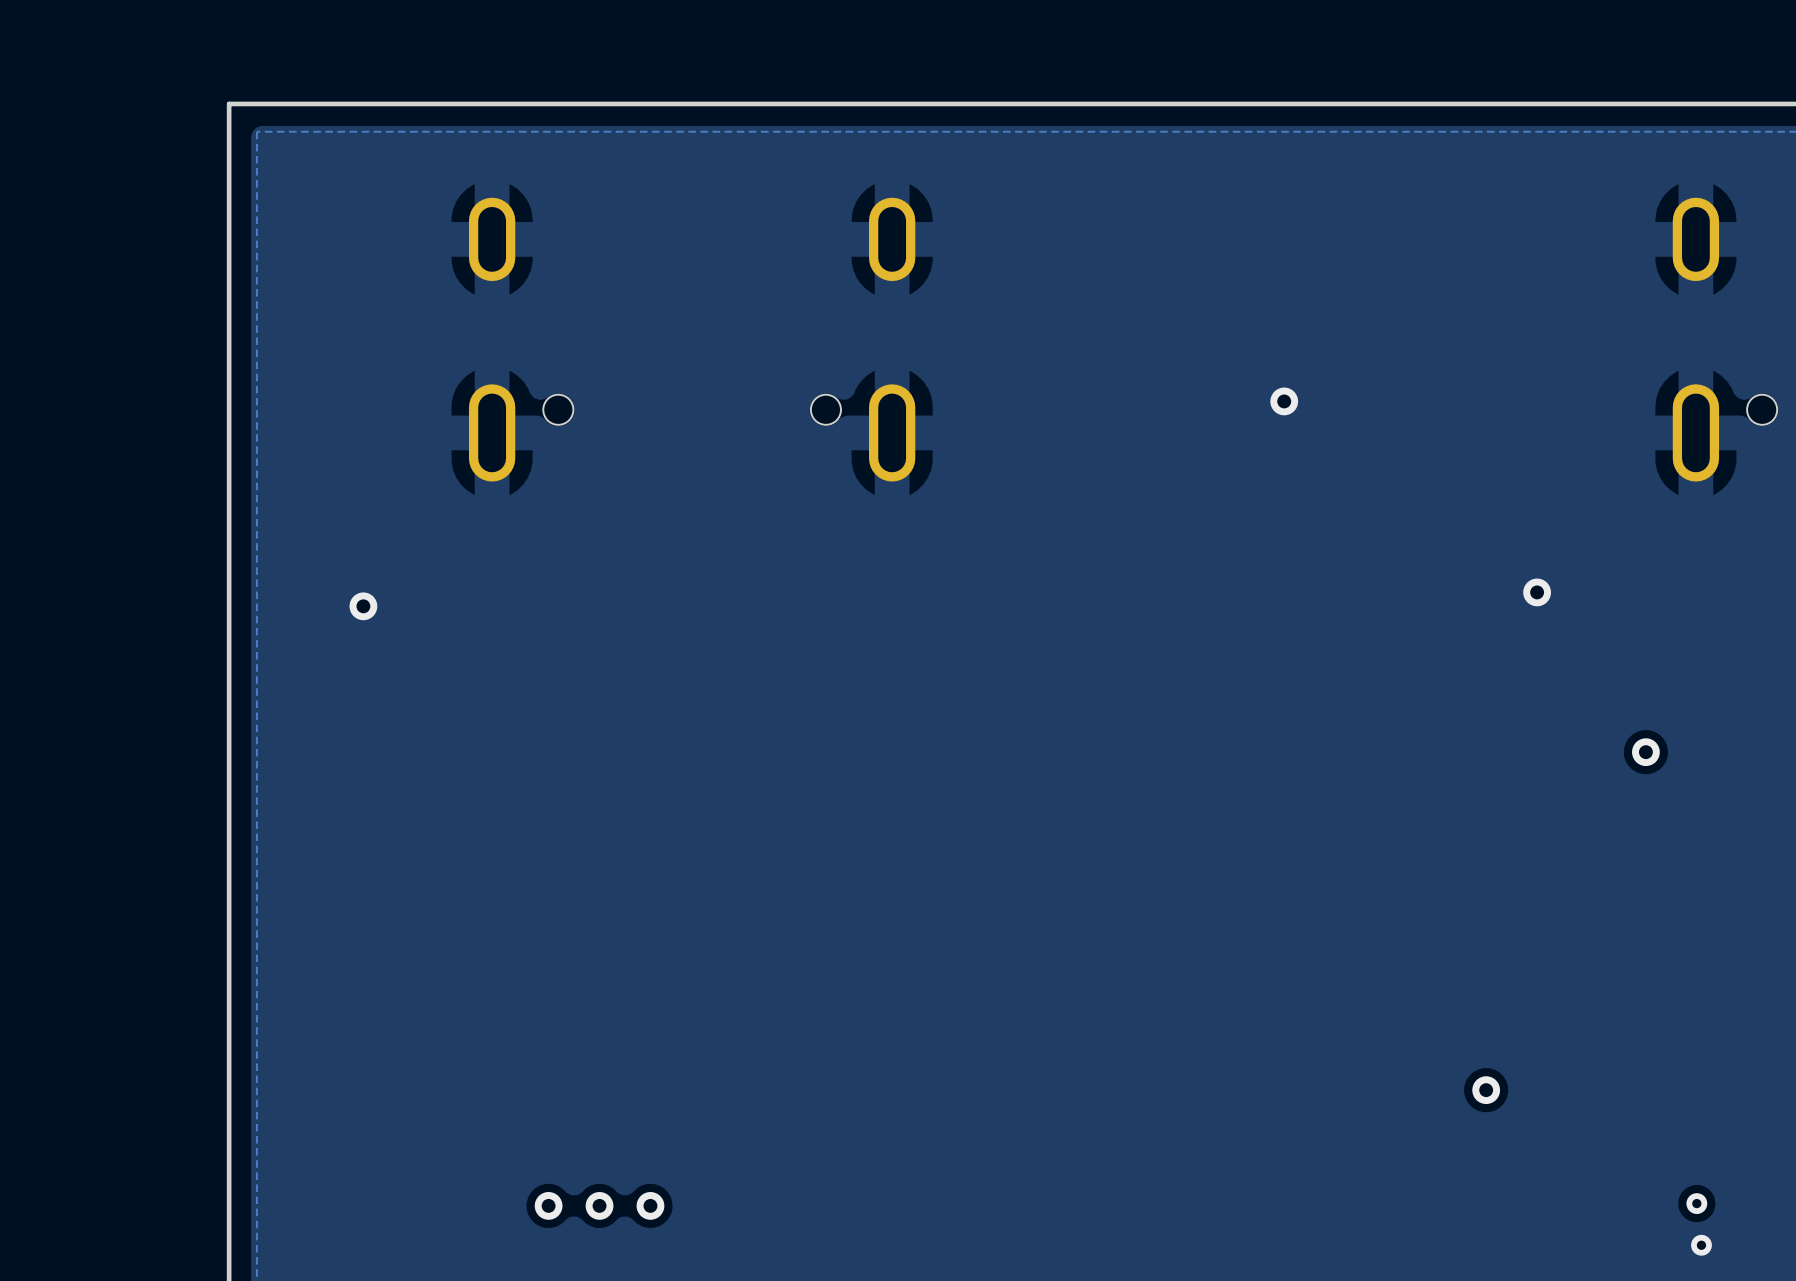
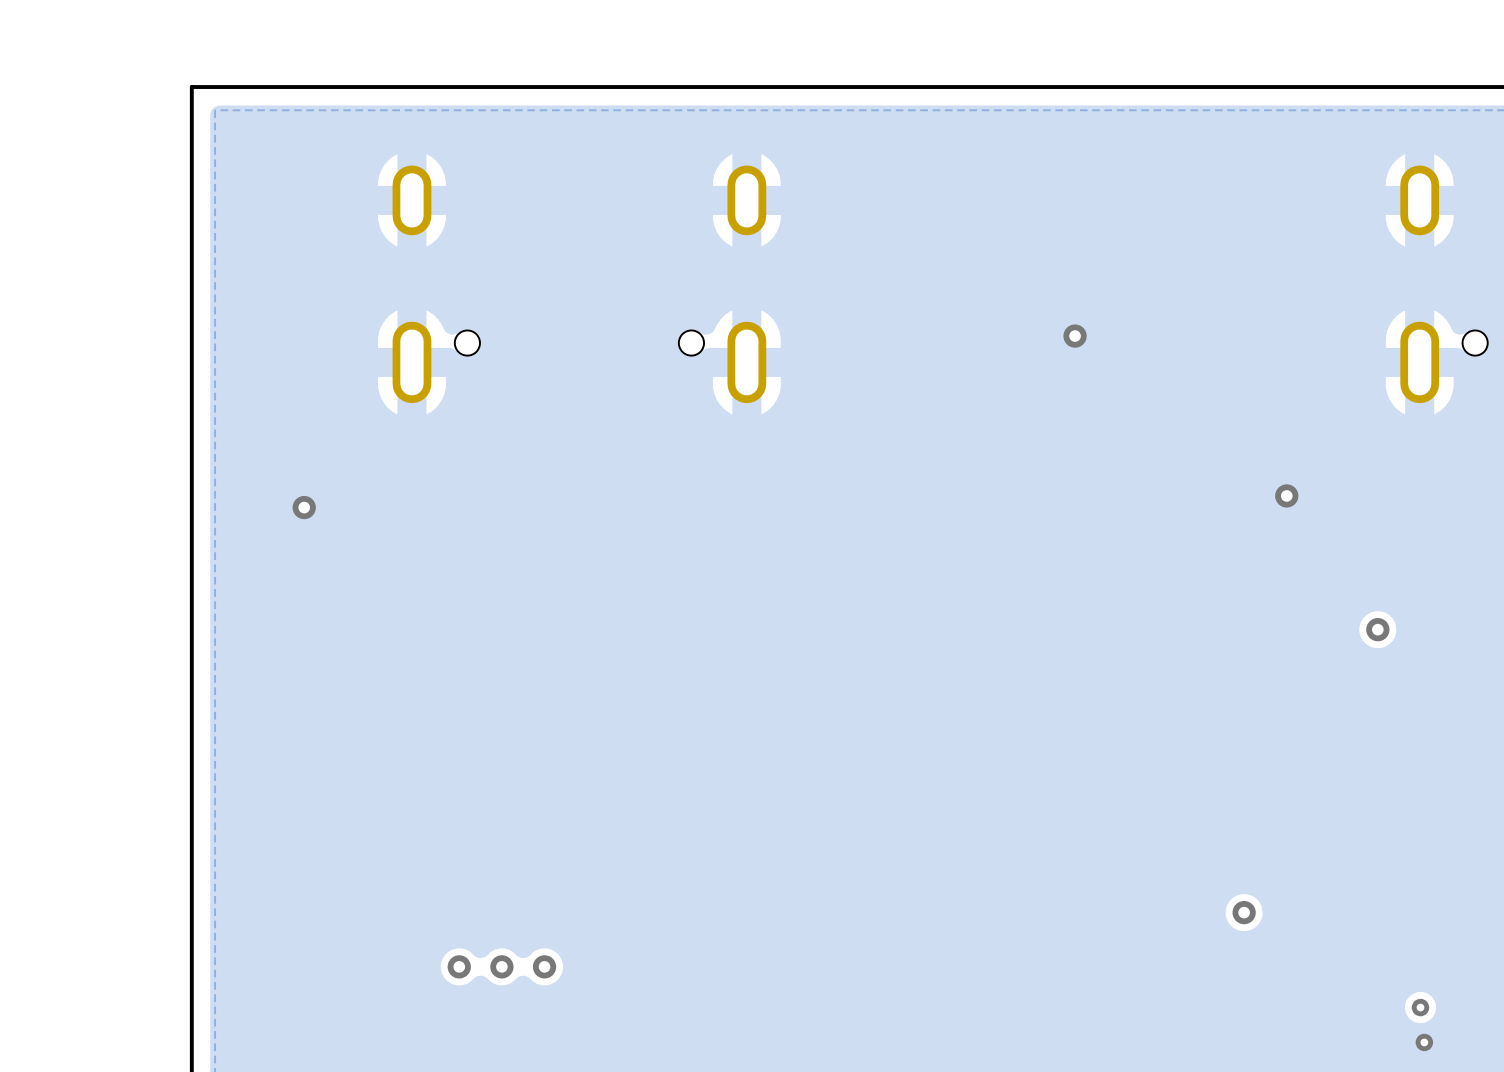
via: none -> (459, 966)
via: none -> (501, 966)
via: none -> (544, 966)
via: (548, 1205) -> none
via: (599, 1205) -> none
via: (650, 1205) -> none

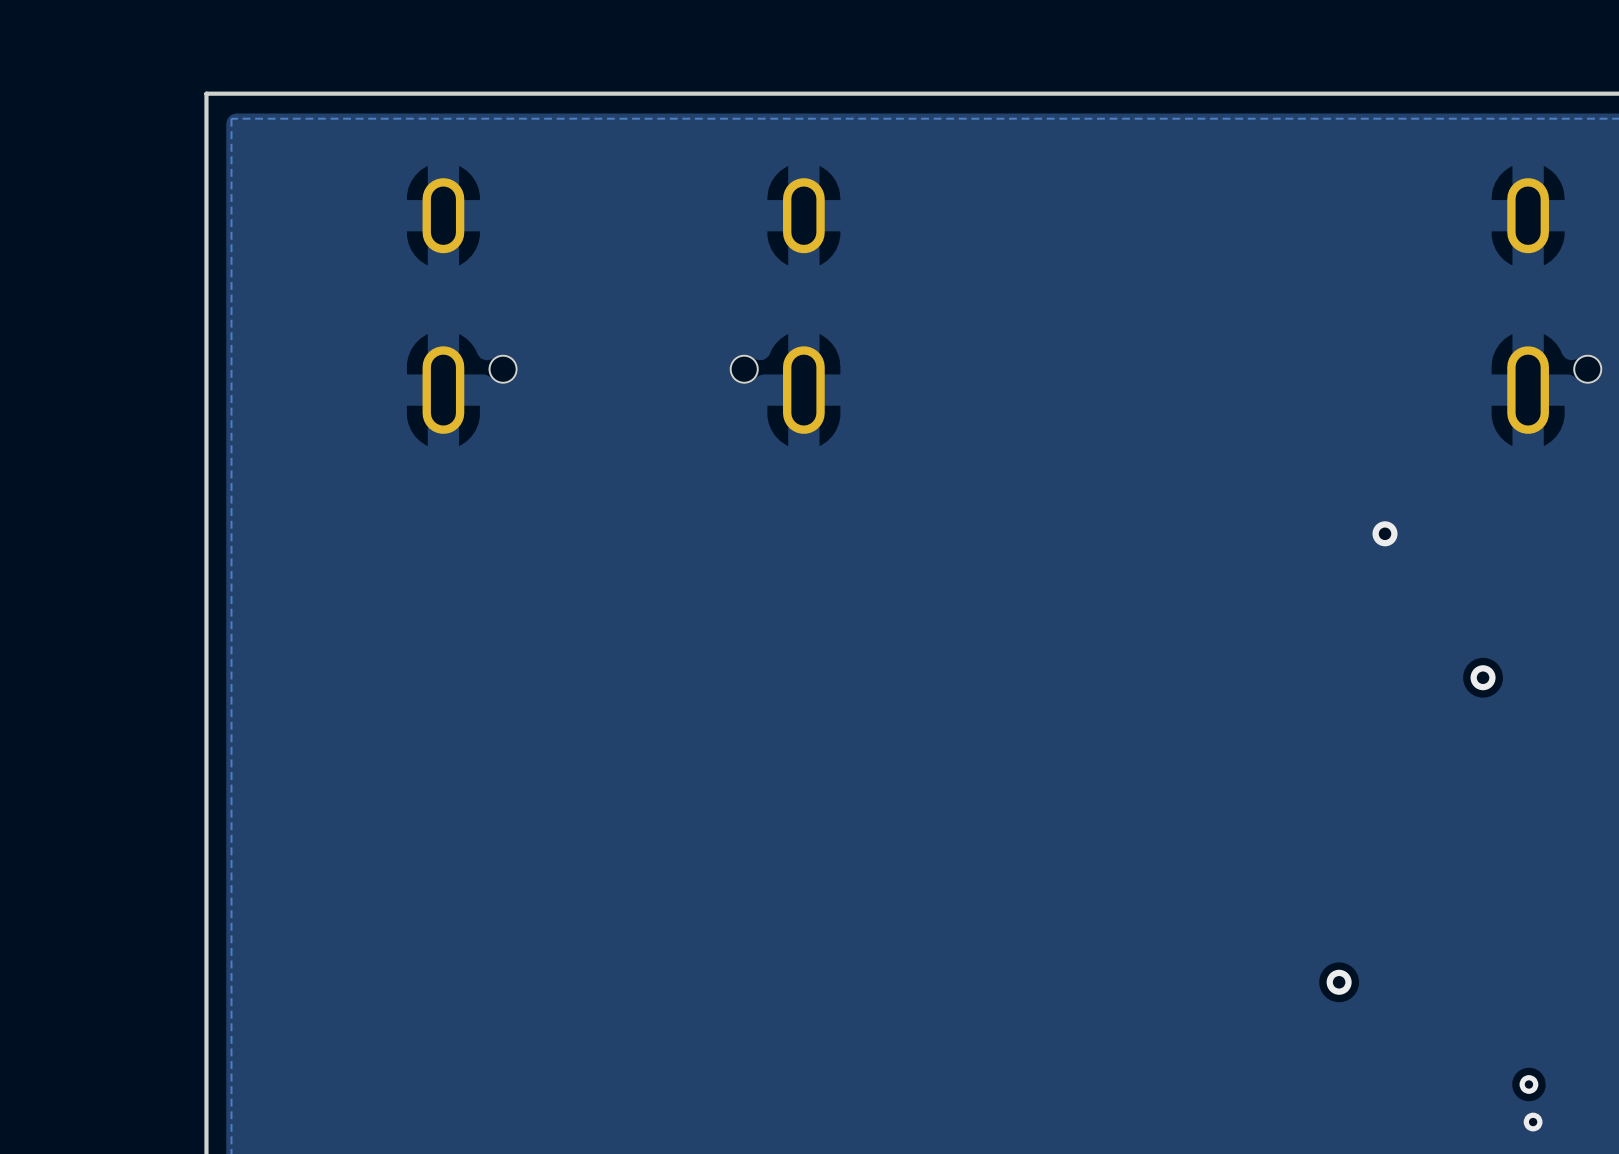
via: (1075, 336) -> none
via: (304, 507) -> none
via: (459, 966) -> none
via: (501, 966) -> none
via: (544, 966) -> none

